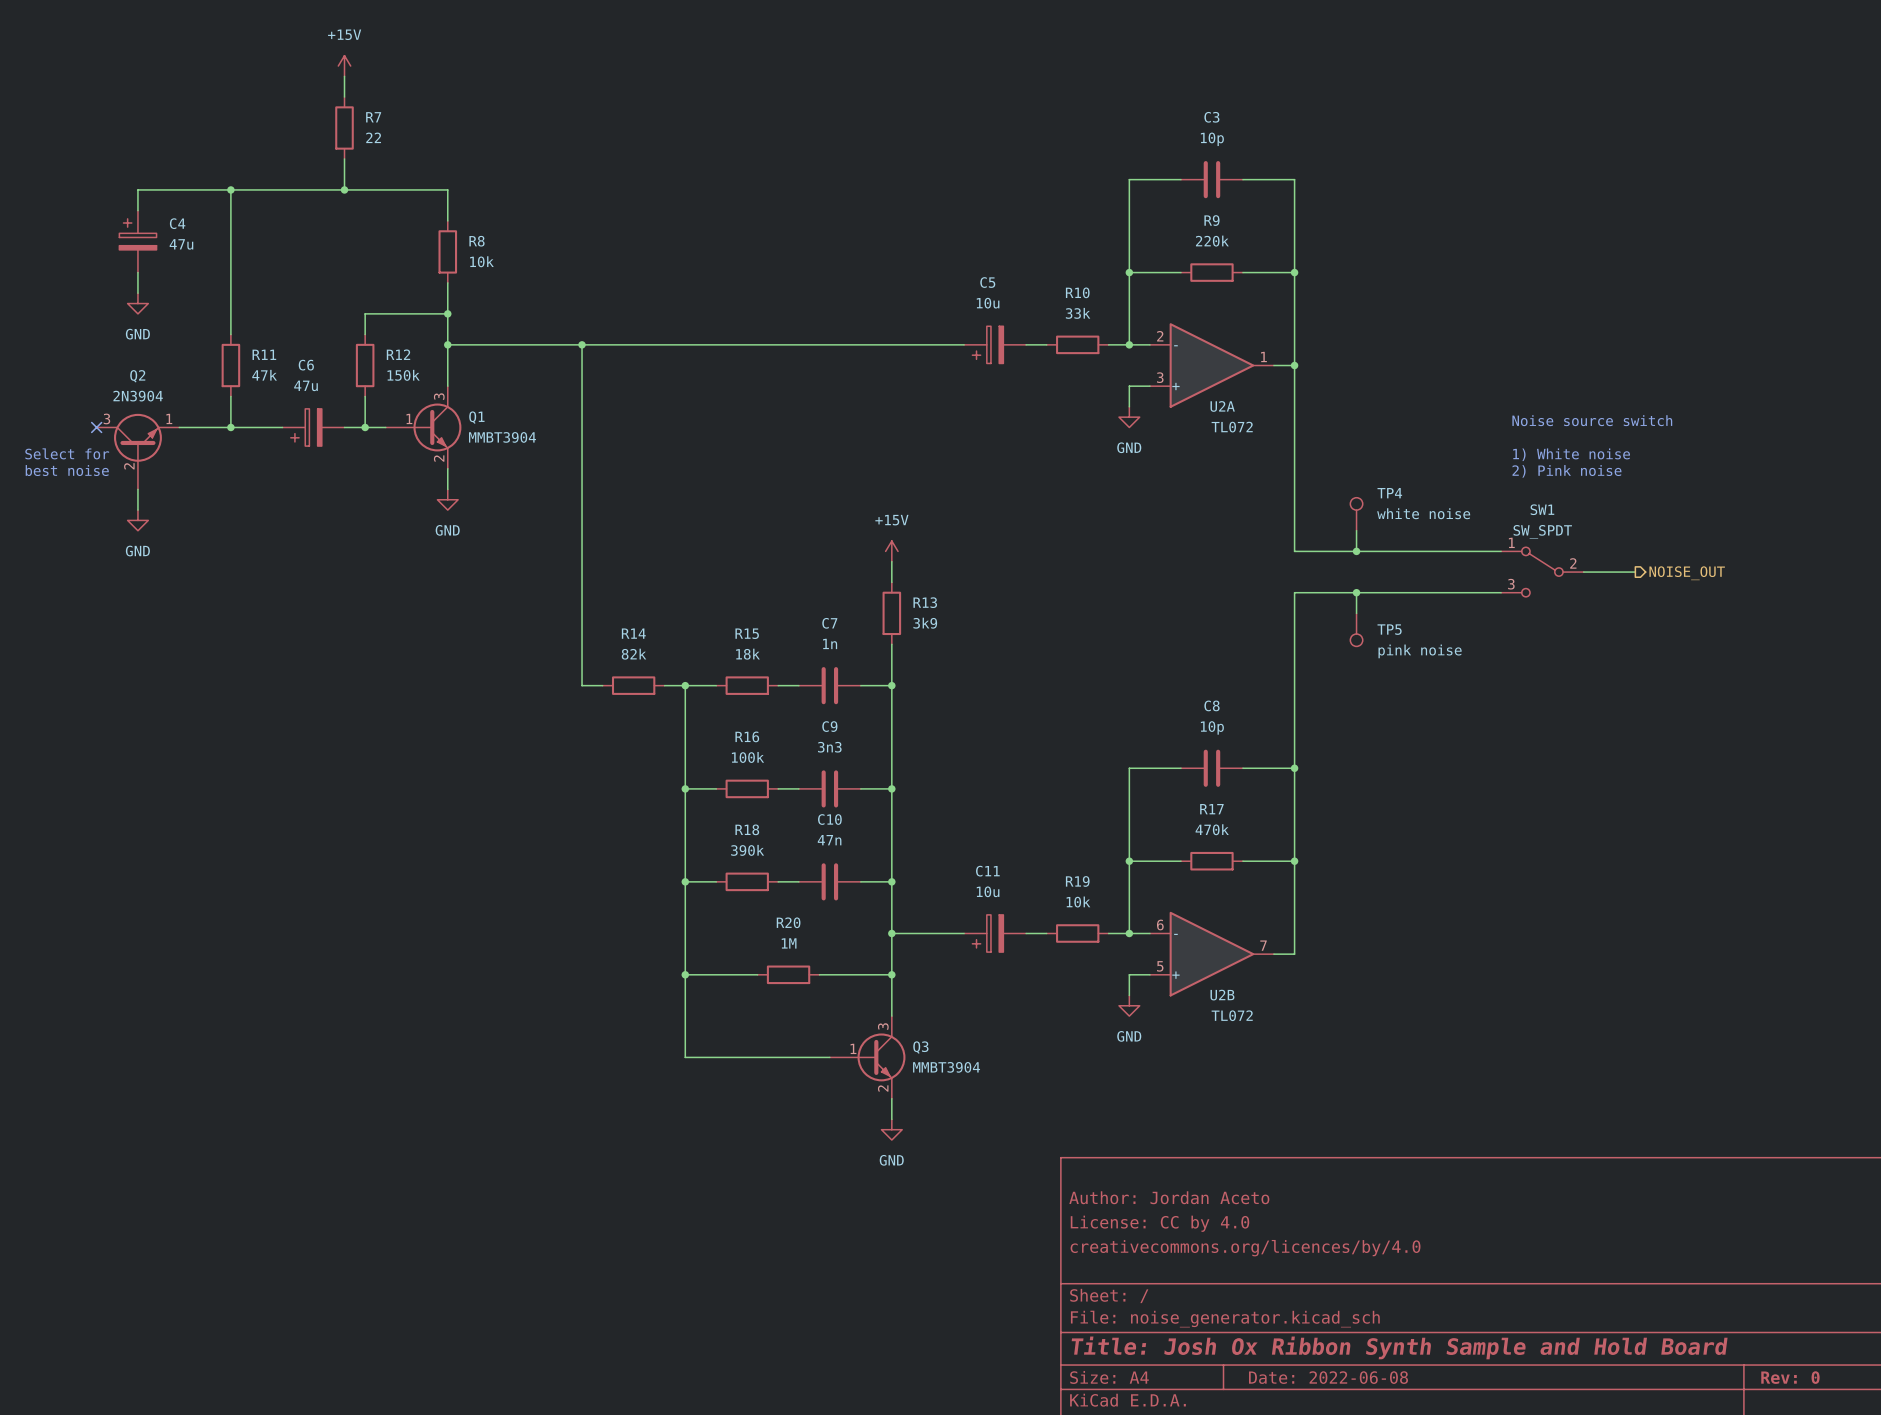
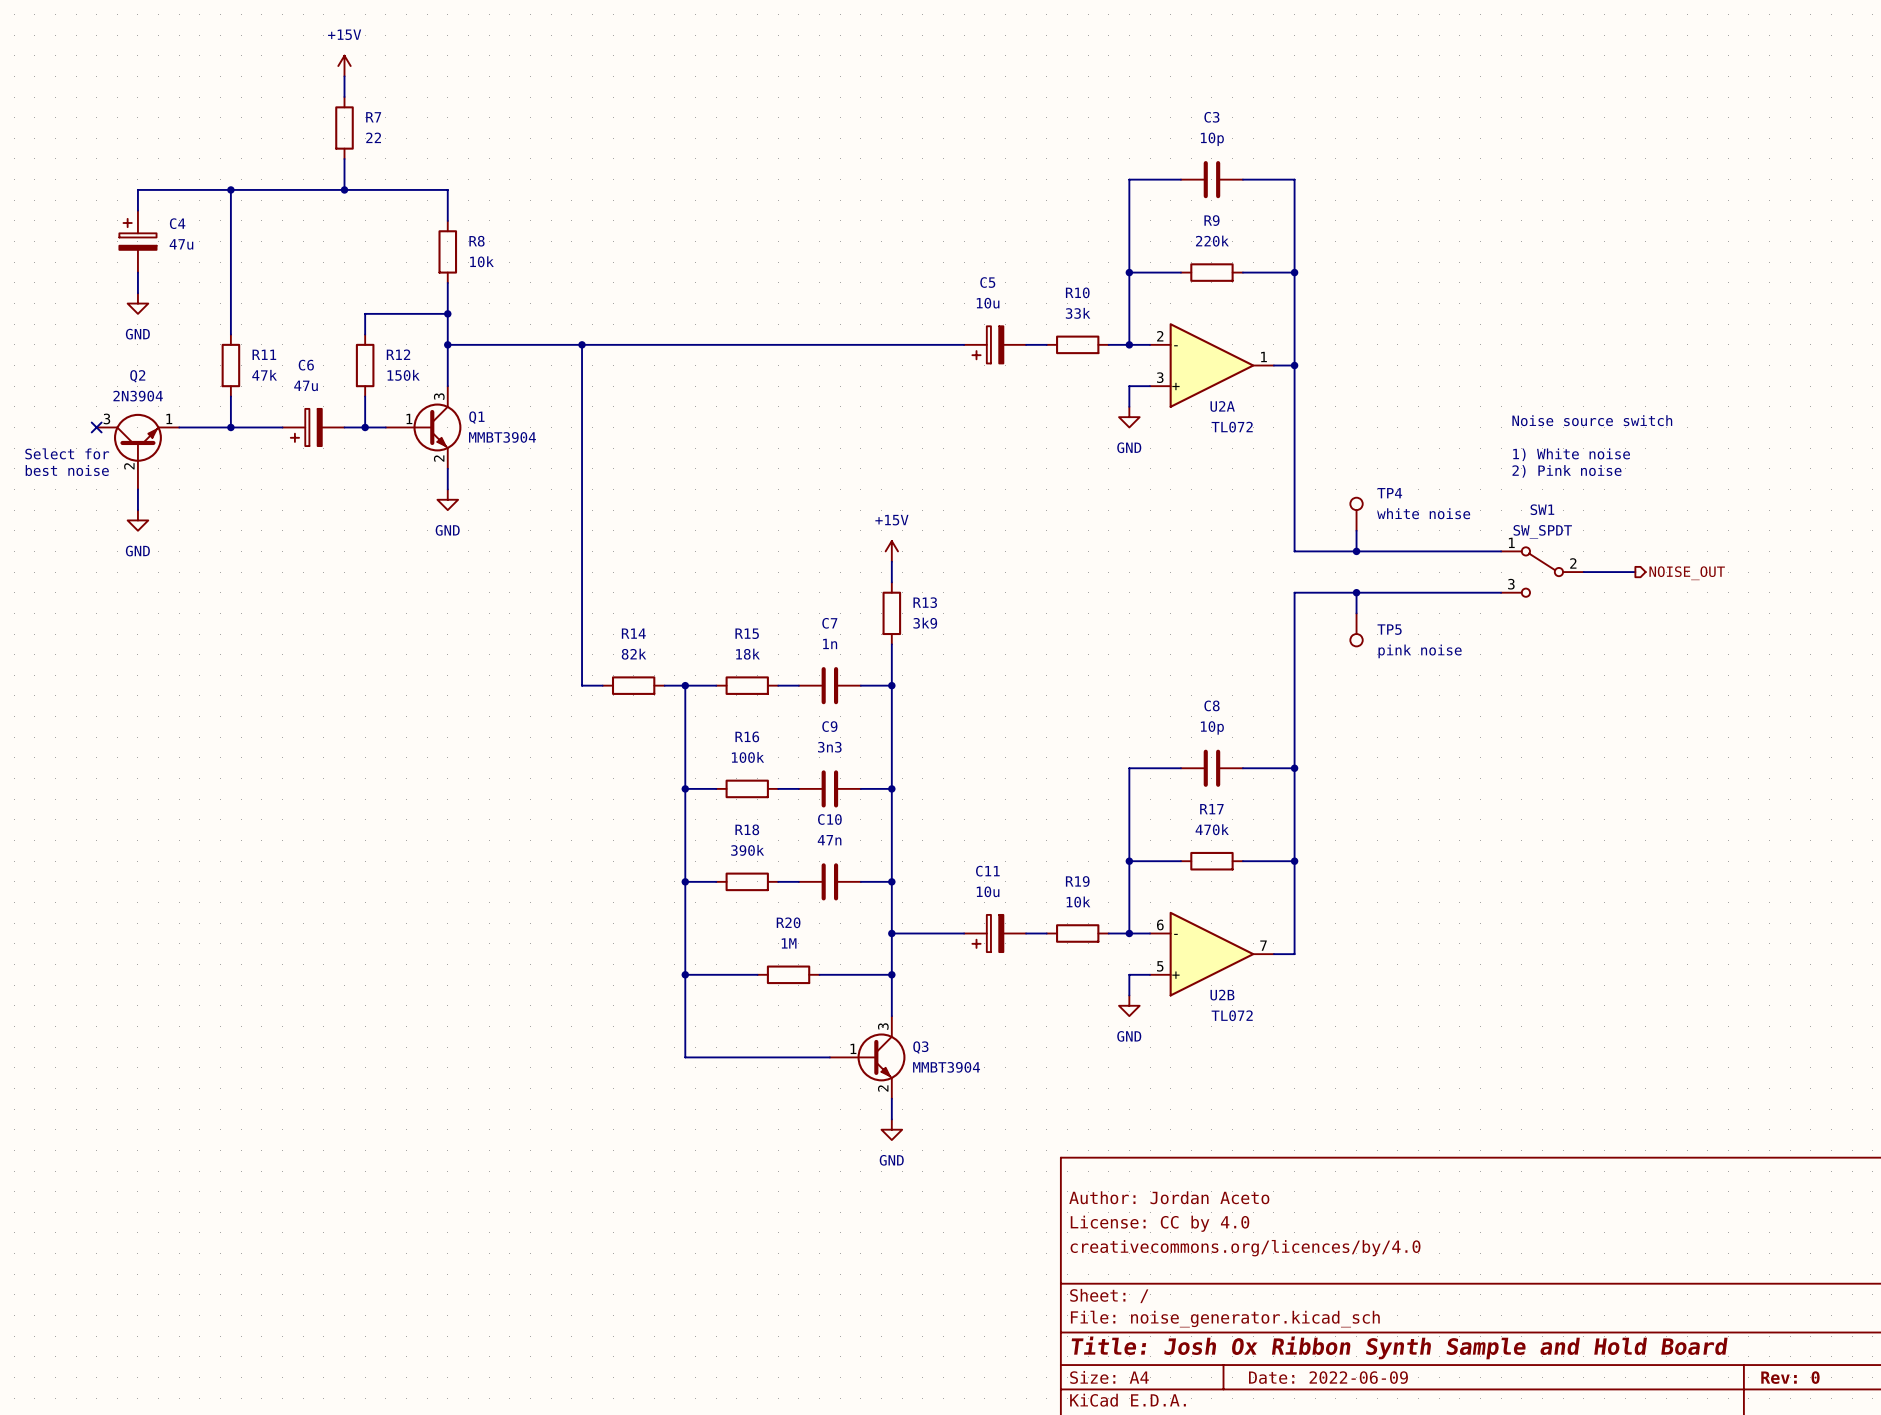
title block: Date: 2022-06-08 (1328, 1377) -> Date: 2022-06-09 (1328, 1377)

